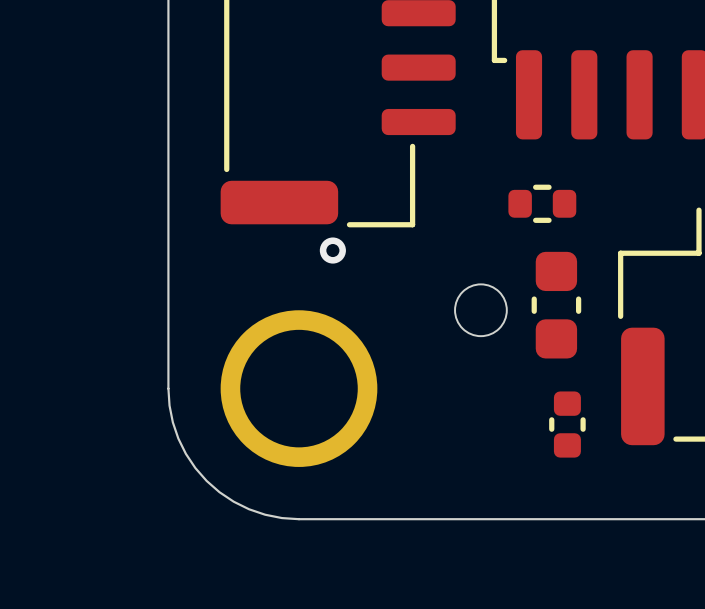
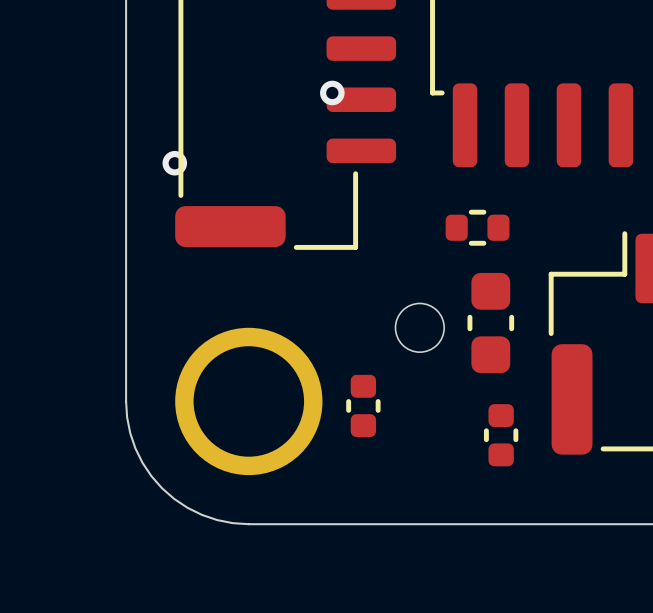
via: none -> (332, 92)
via: none -> (174, 163)
via: (332, 250) -> none
part: none -> (363, 405)

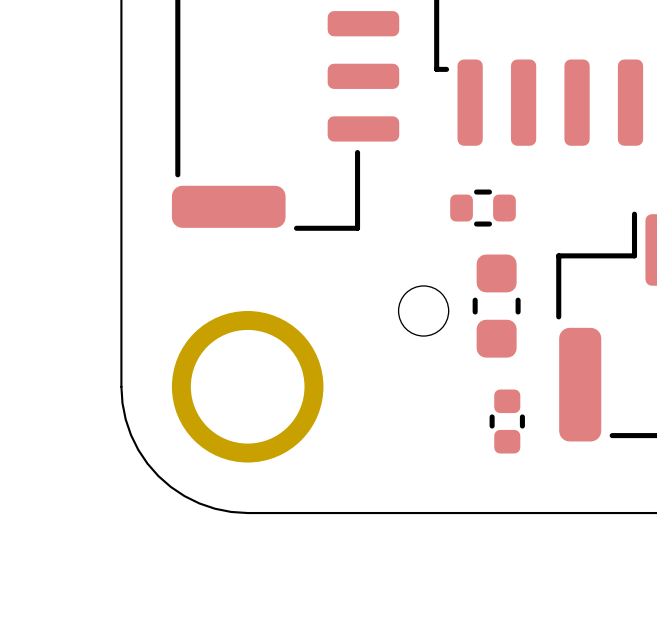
via: (332, 92) -> none
via: (174, 163) -> none
part: (363, 405) -> none

